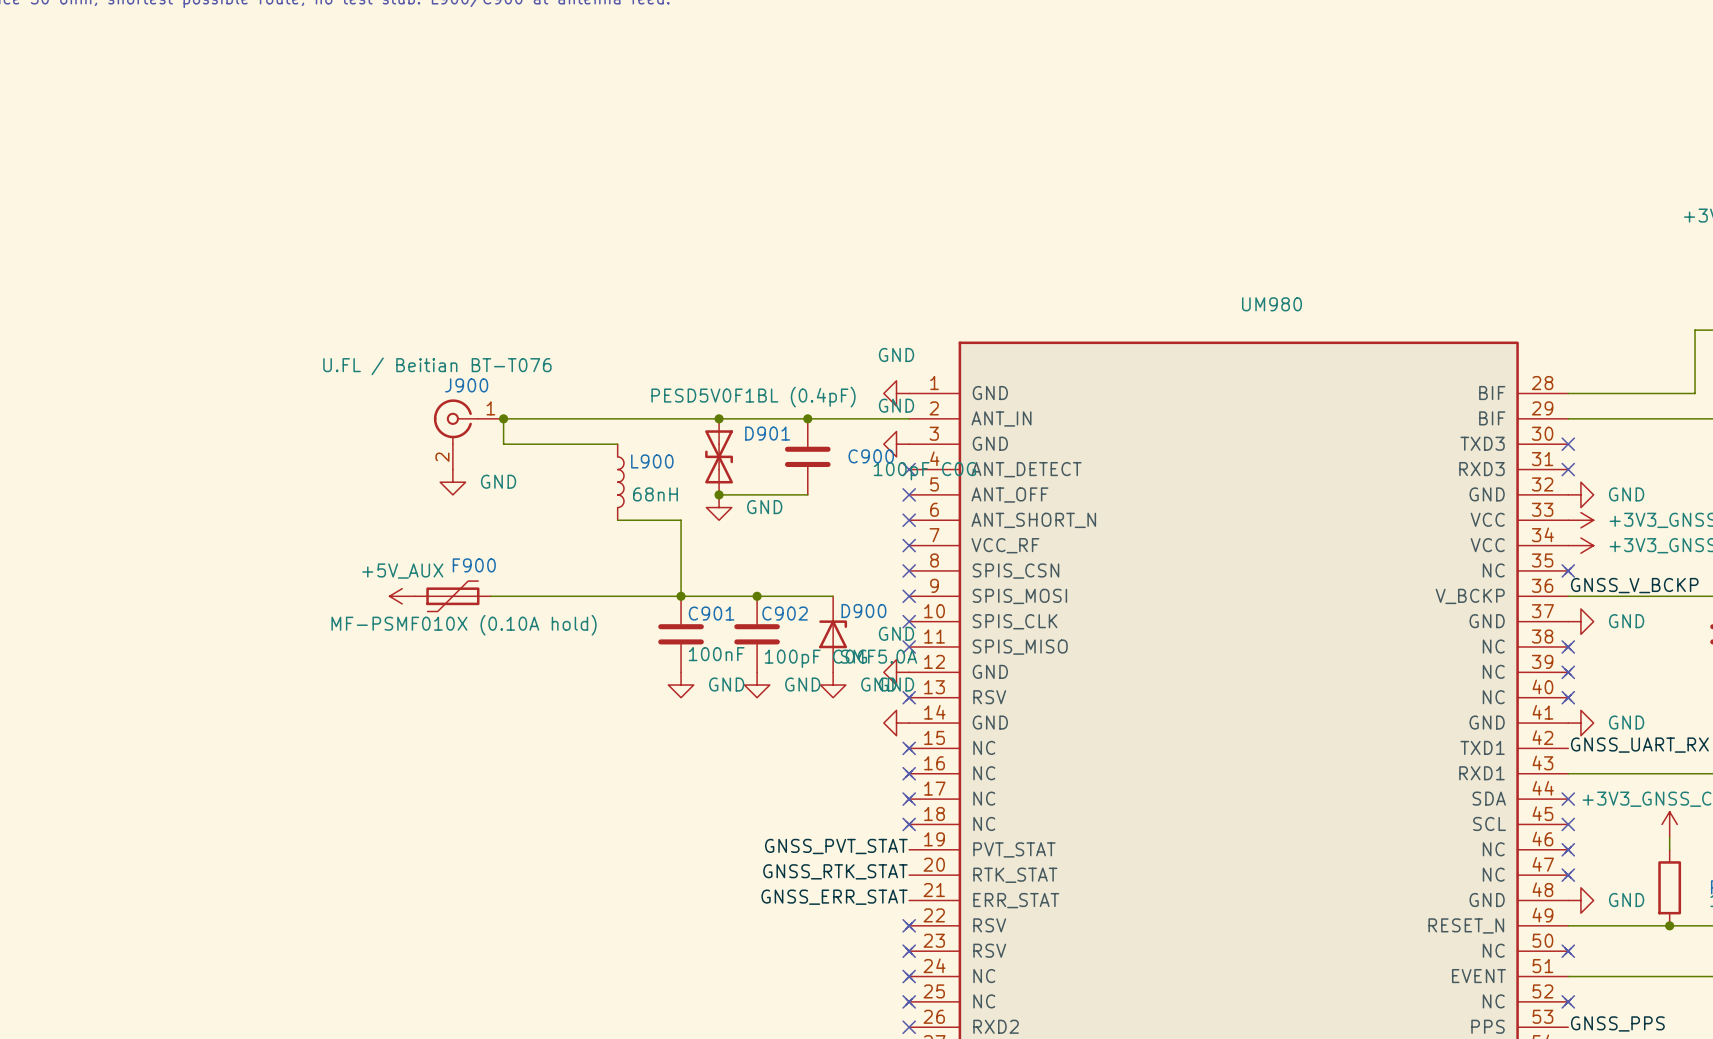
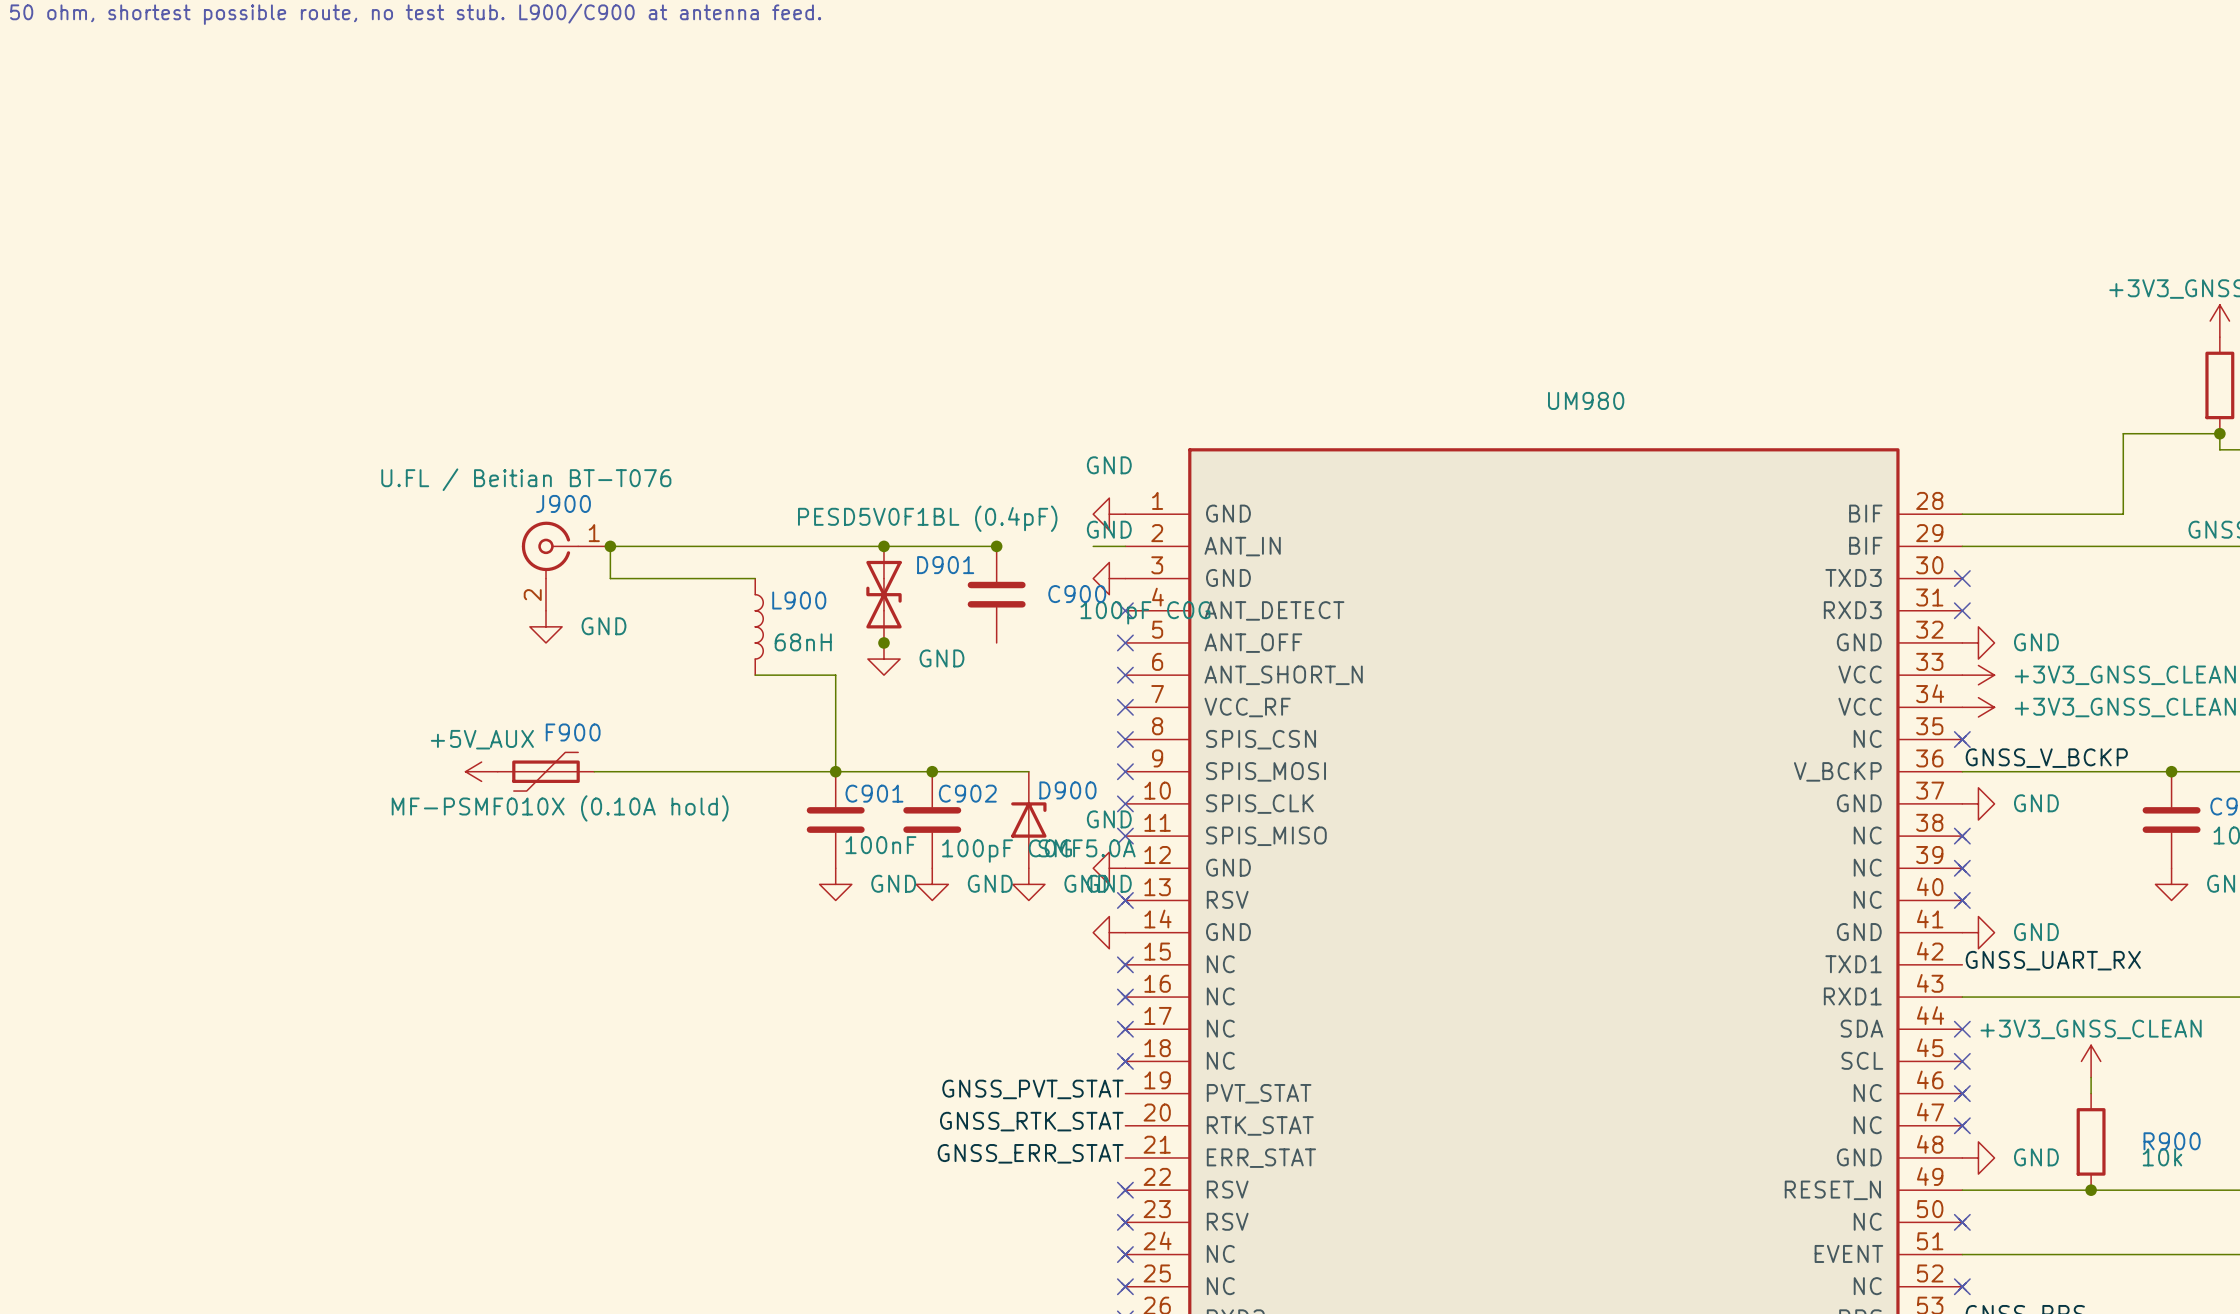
wire: (807, 418) (883, 418) -> none
wire: (719, 494) (807, 494) -> none

